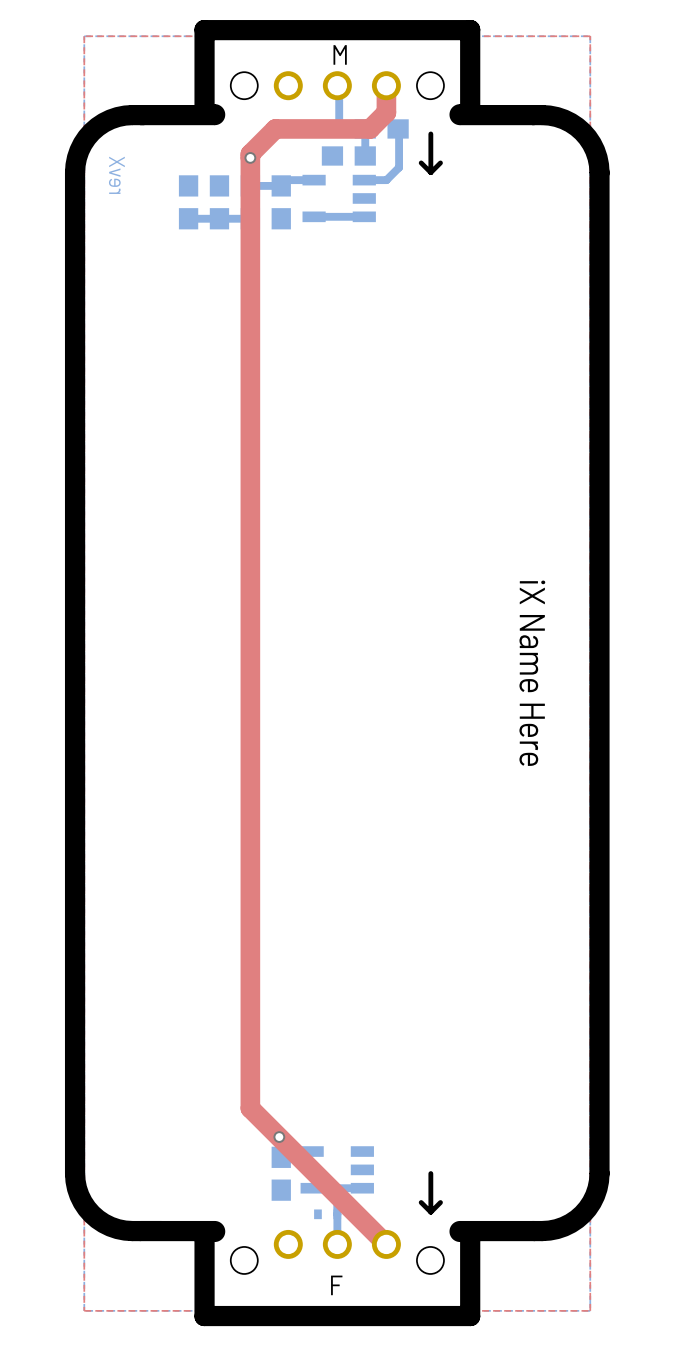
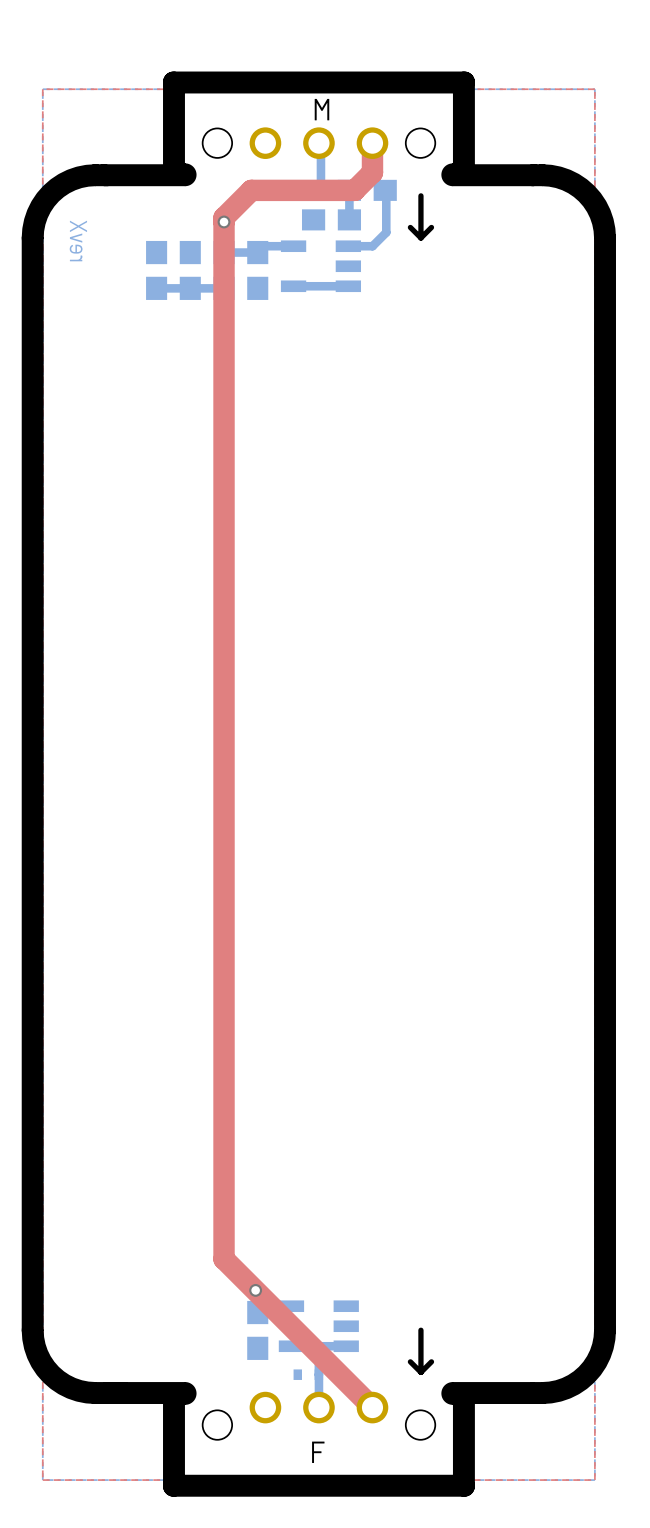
text: iX Name Here (532, 673) -> none

